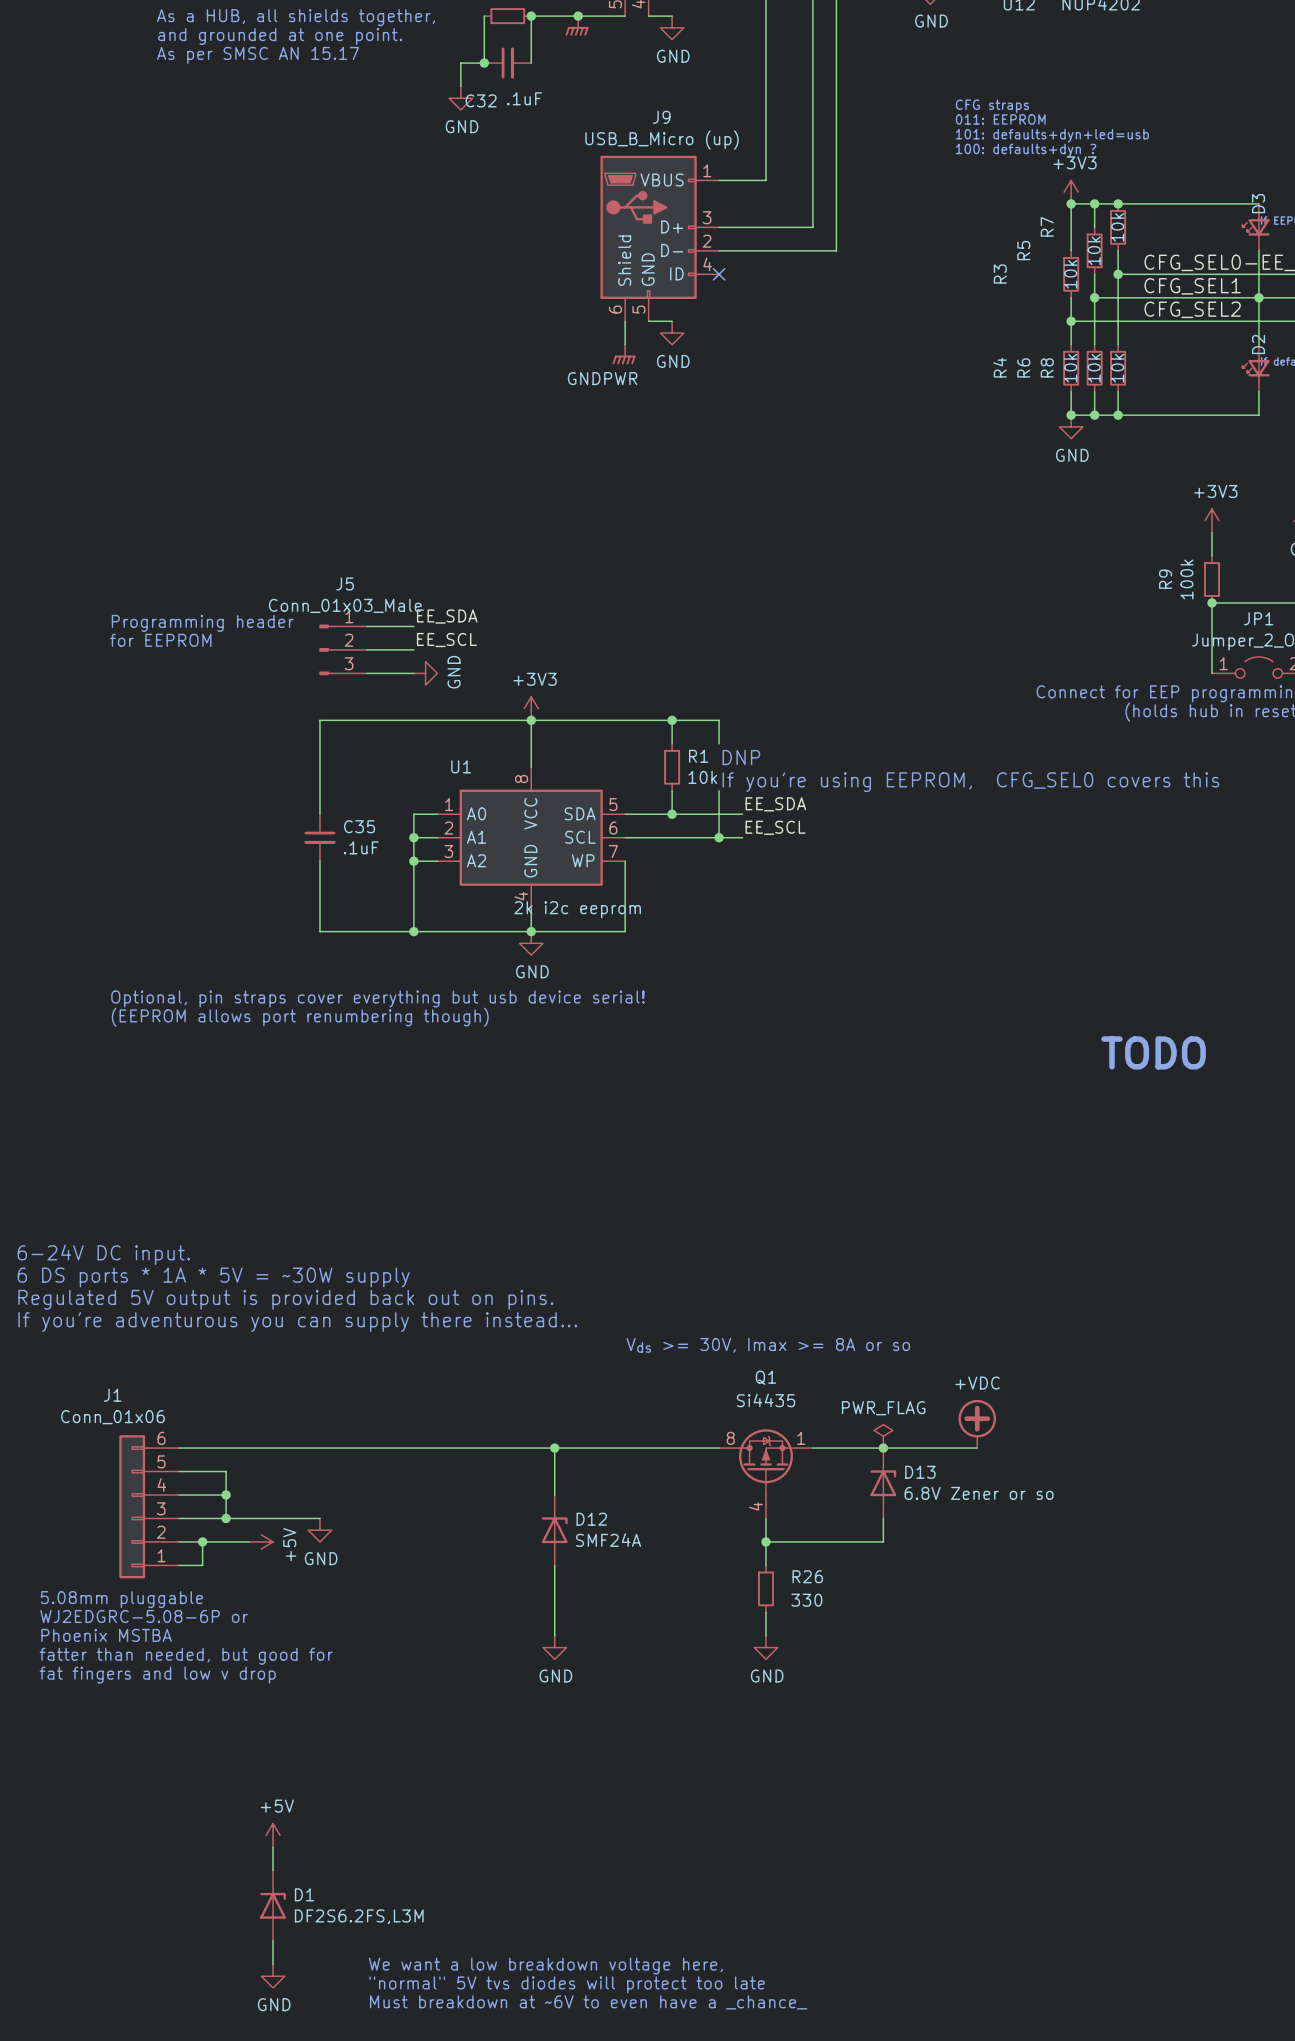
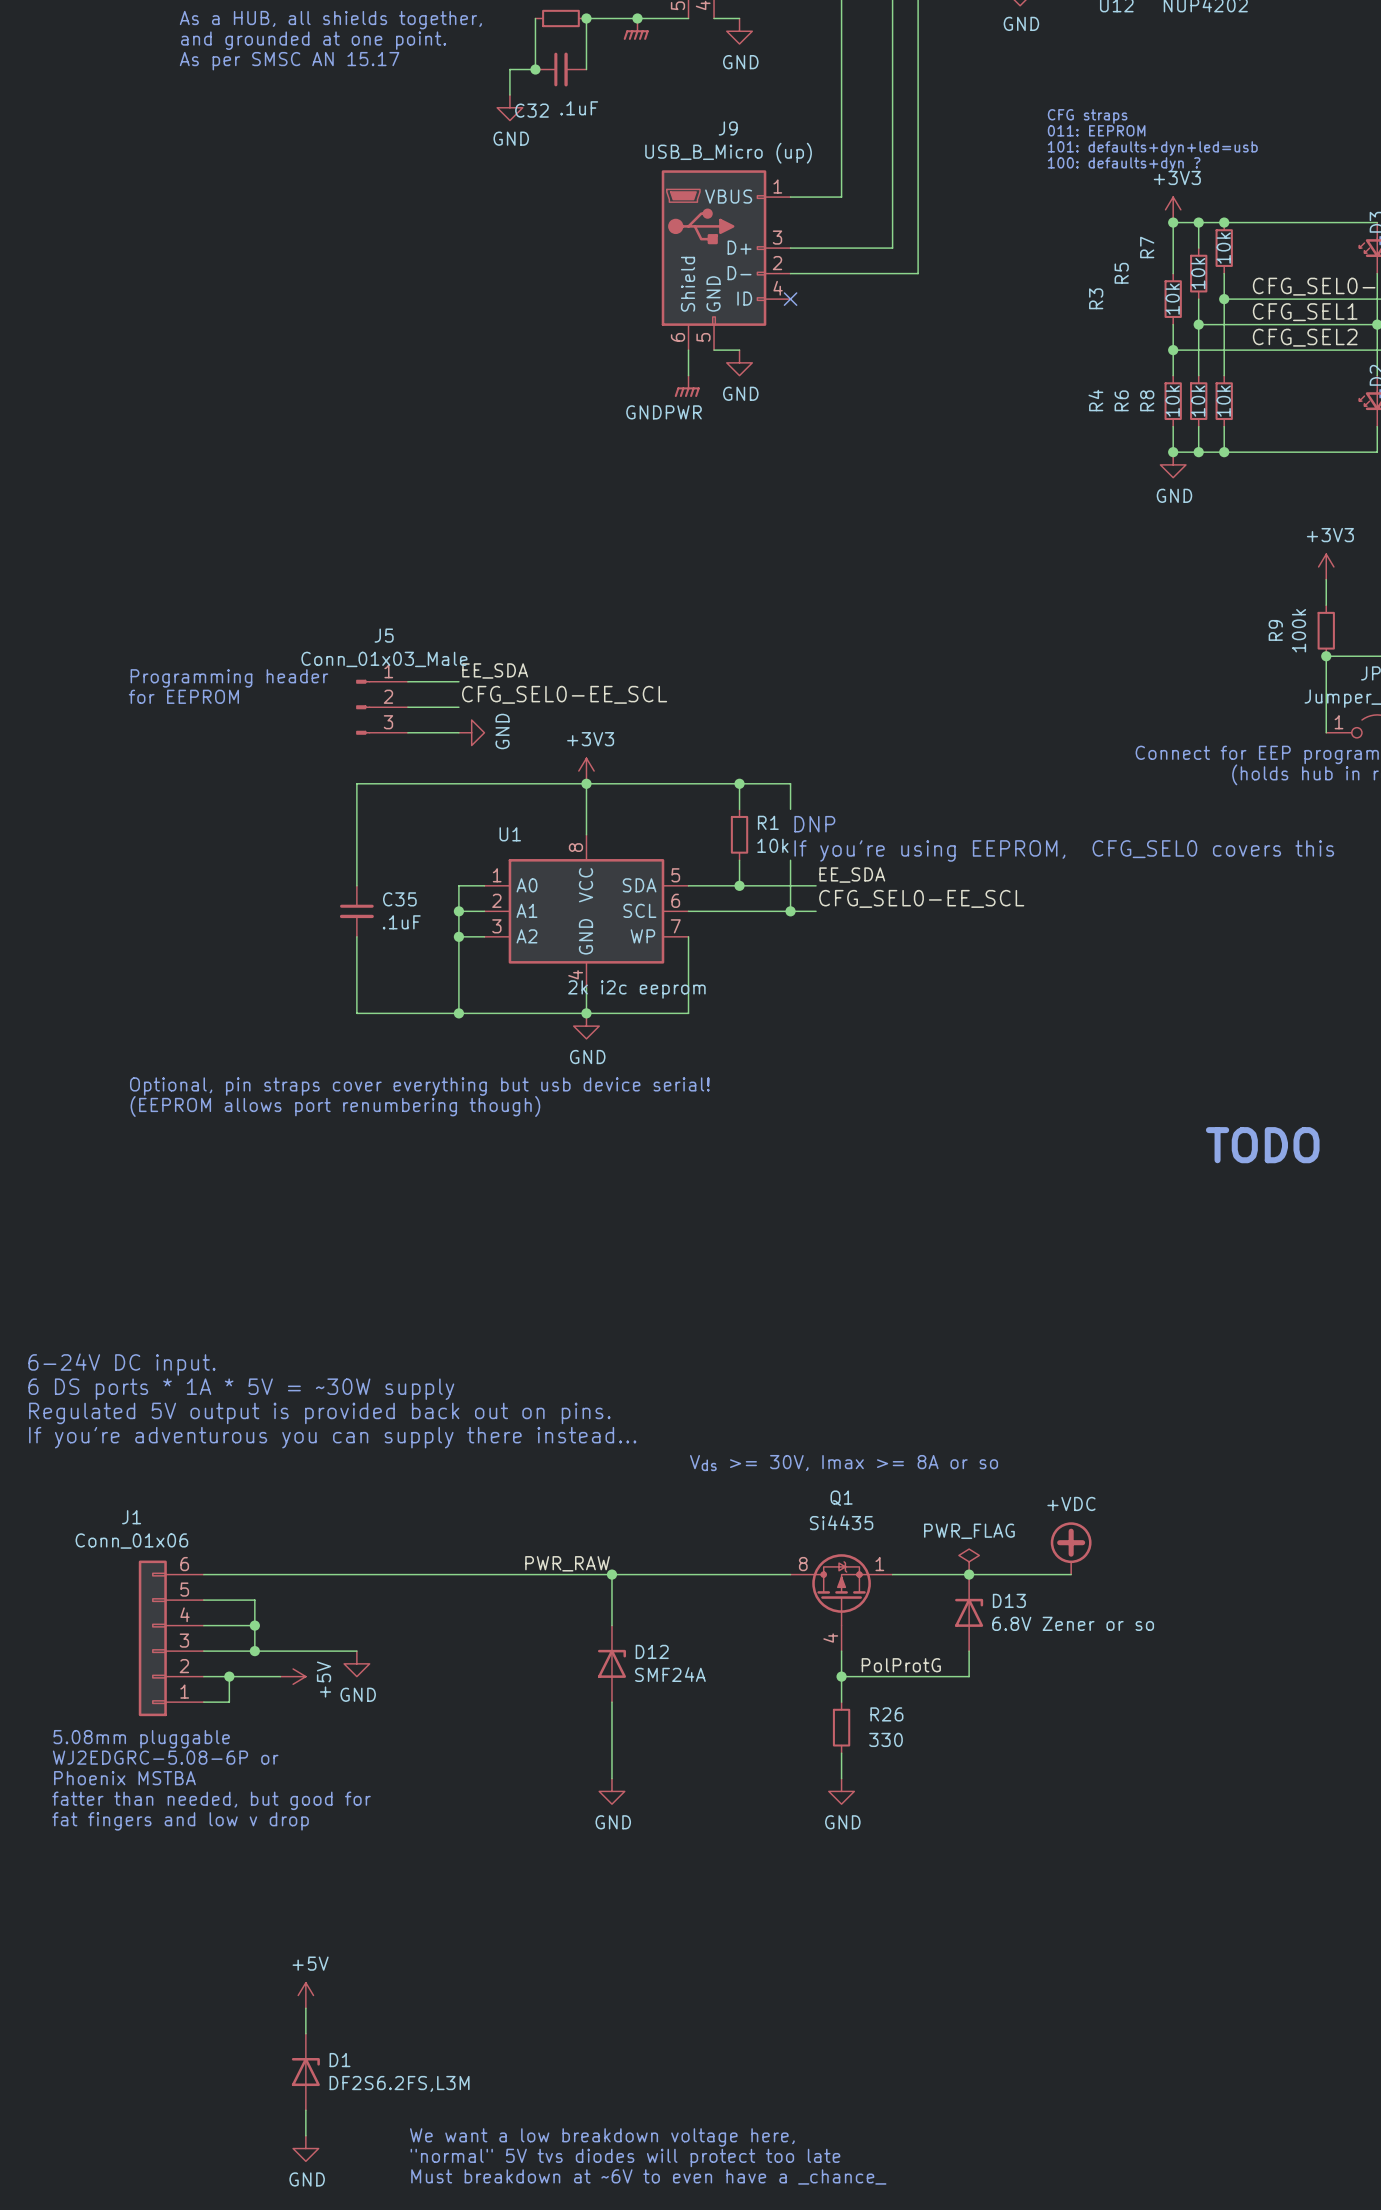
label: EE_SCL (446, 640) -> CFG_SEL0-EE_SCL (564, 694)
label: EE_SCL (775, 827) -> CFG_SEL0-EE_SCL (921, 898)
label: none -> PWR_RAW (567, 1563)
label: none -> PolProtG (901, 1665)

